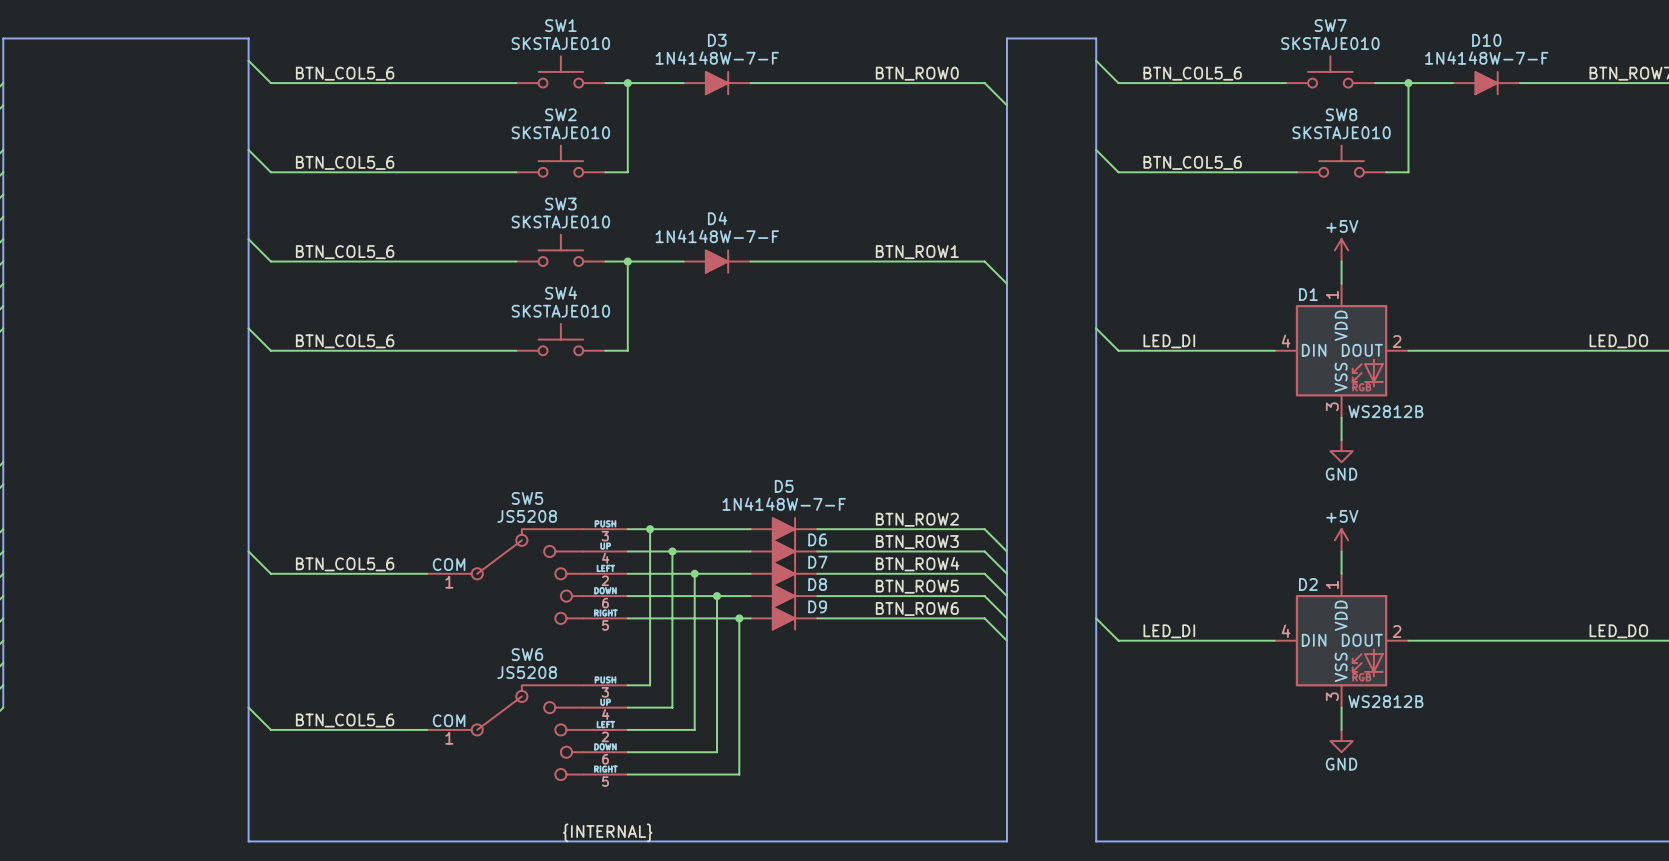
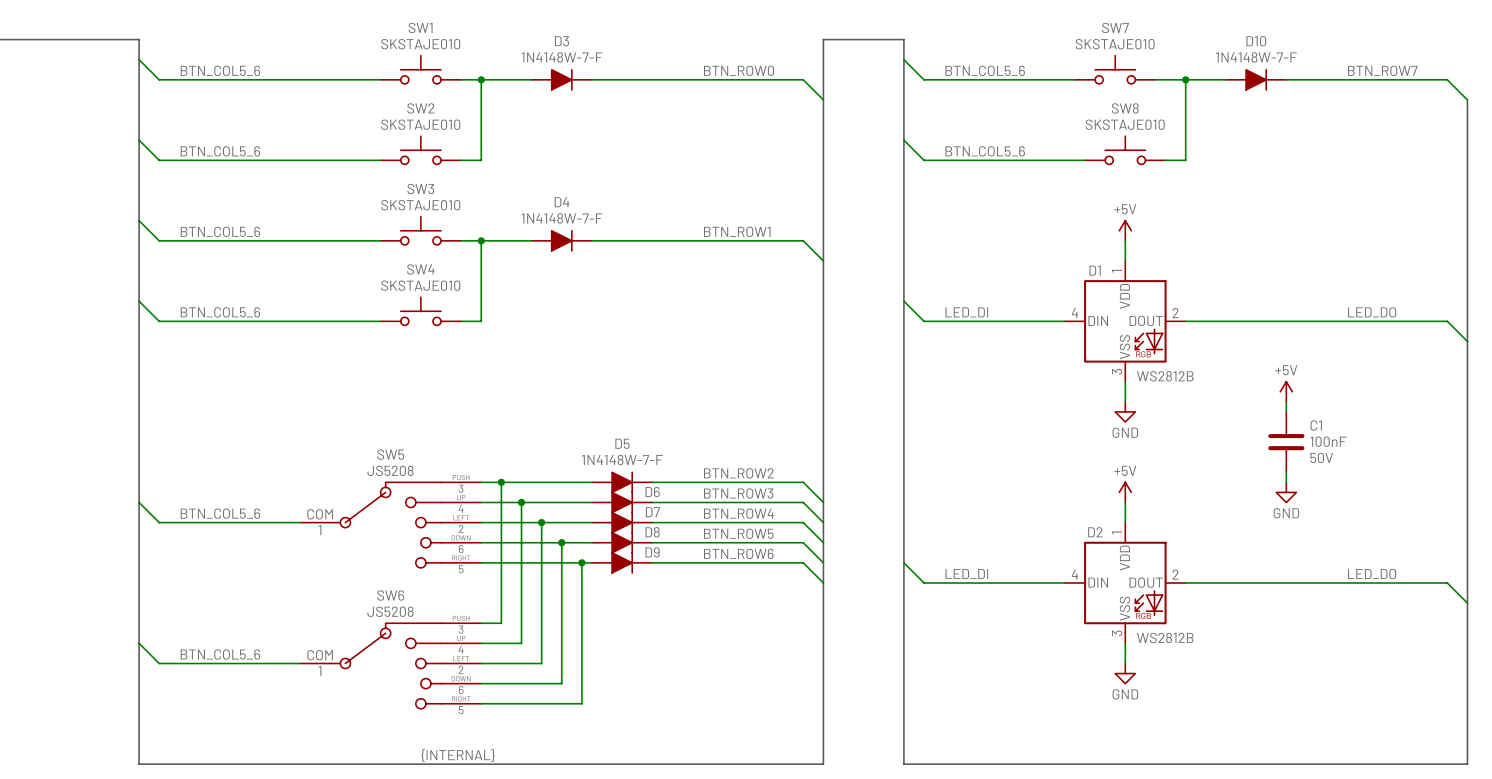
power symbol: none -> +5V (1286, 391)
wire: none -> (1286, 401) (1286, 411)
C1: none -> (1286, 442)
wire: none -> (1286, 472) (1286, 482)
power symbol: none -> GND (1286, 492)

